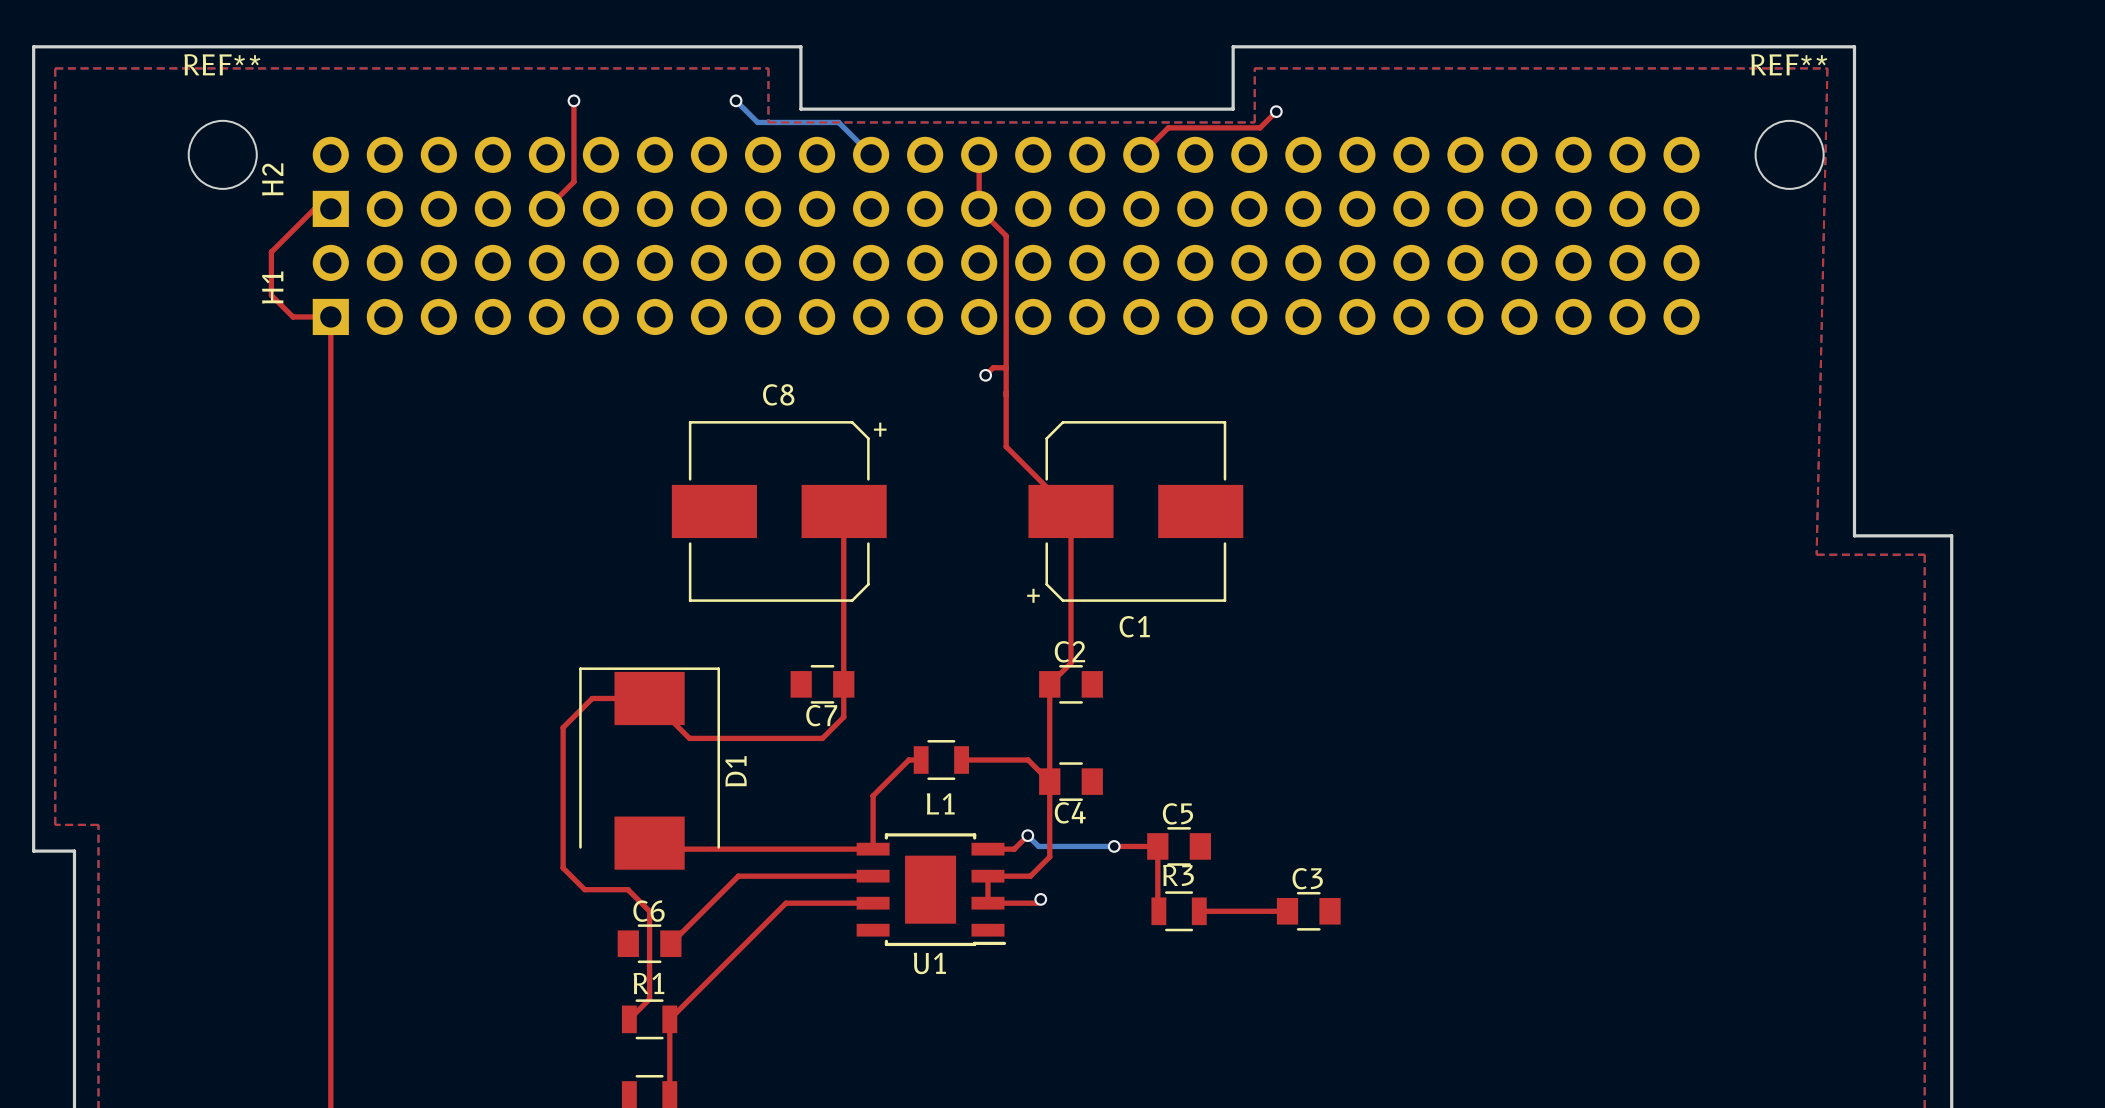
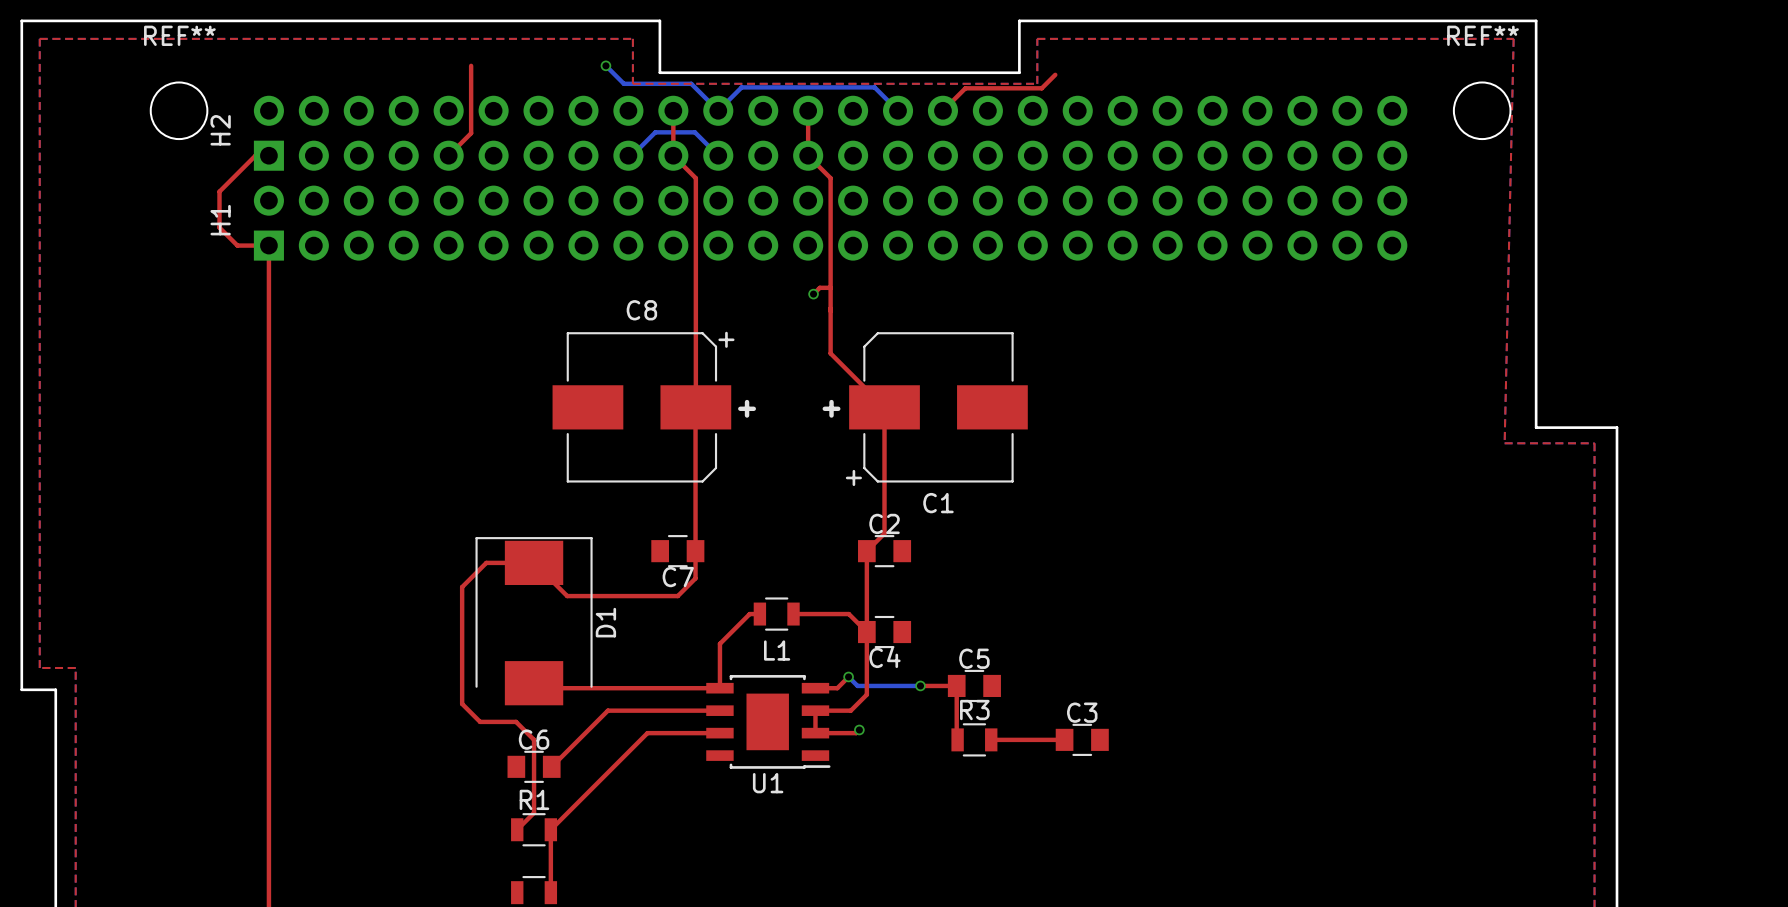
via: (573, 100) -> none
via: (1276, 111) -> none
top track: none -> (673, 110) (673, 155) (695, 178) (695, 407)
bottom track: none -> (718, 110) (741, 87) (874, 87) (898, 110)
bottom track: none -> (628, 155) (632, 155) (655, 132) (694, 132) (718, 155)
text: none -> + (747, 408)
text: none -> + (831, 408)

